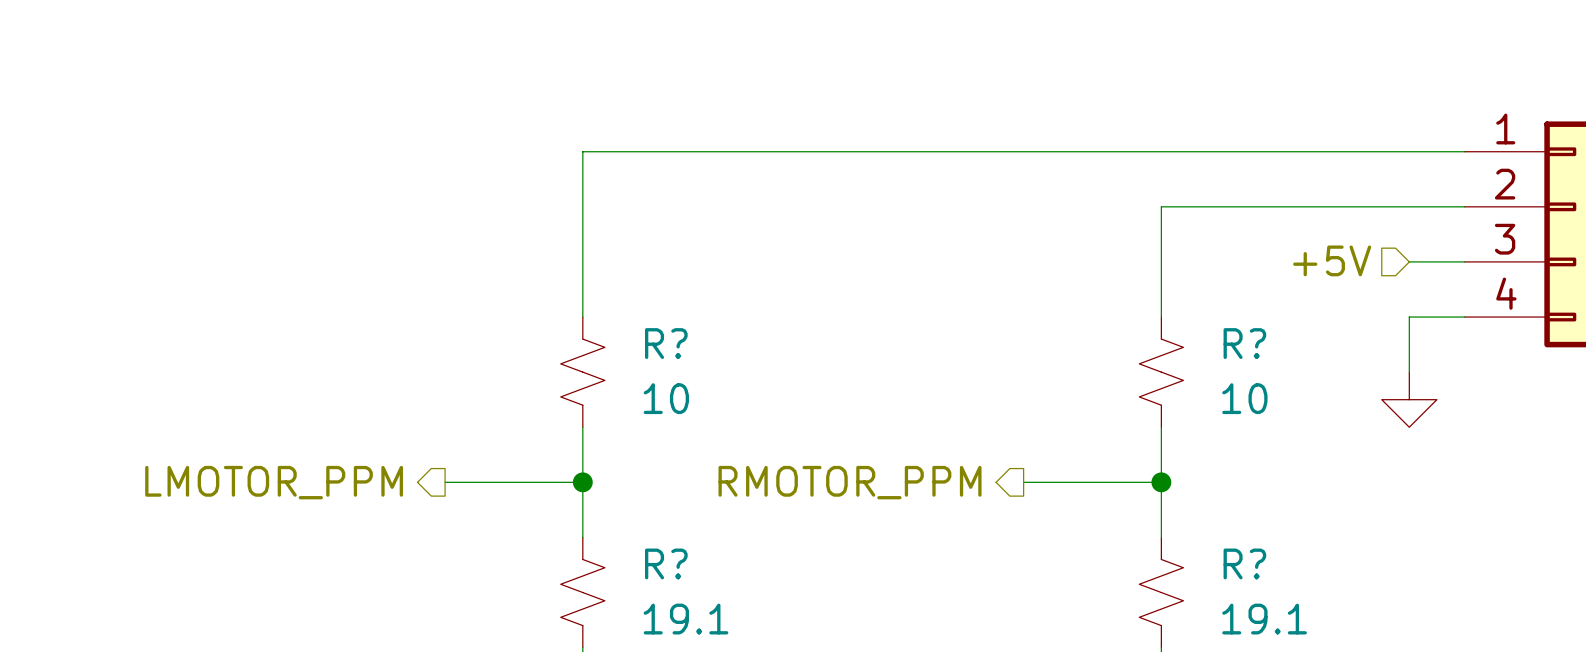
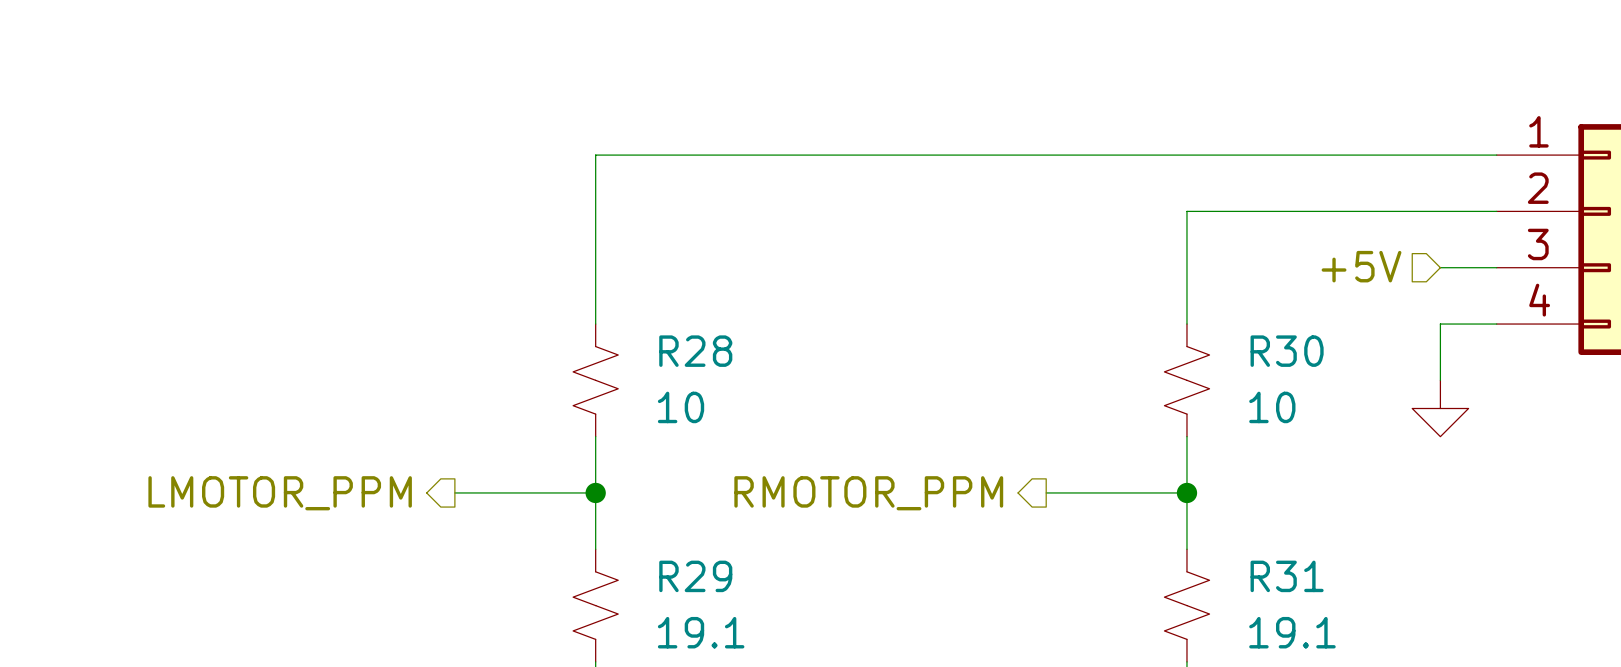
R? name: R? (666, 343) -> R28 (695, 351)
R? name: R? (1244, 343) -> R30 (1287, 351)
R? name: R? (666, 563) -> R29 (695, 576)
R? name: R? (1244, 563) -> R31 (1287, 576)

